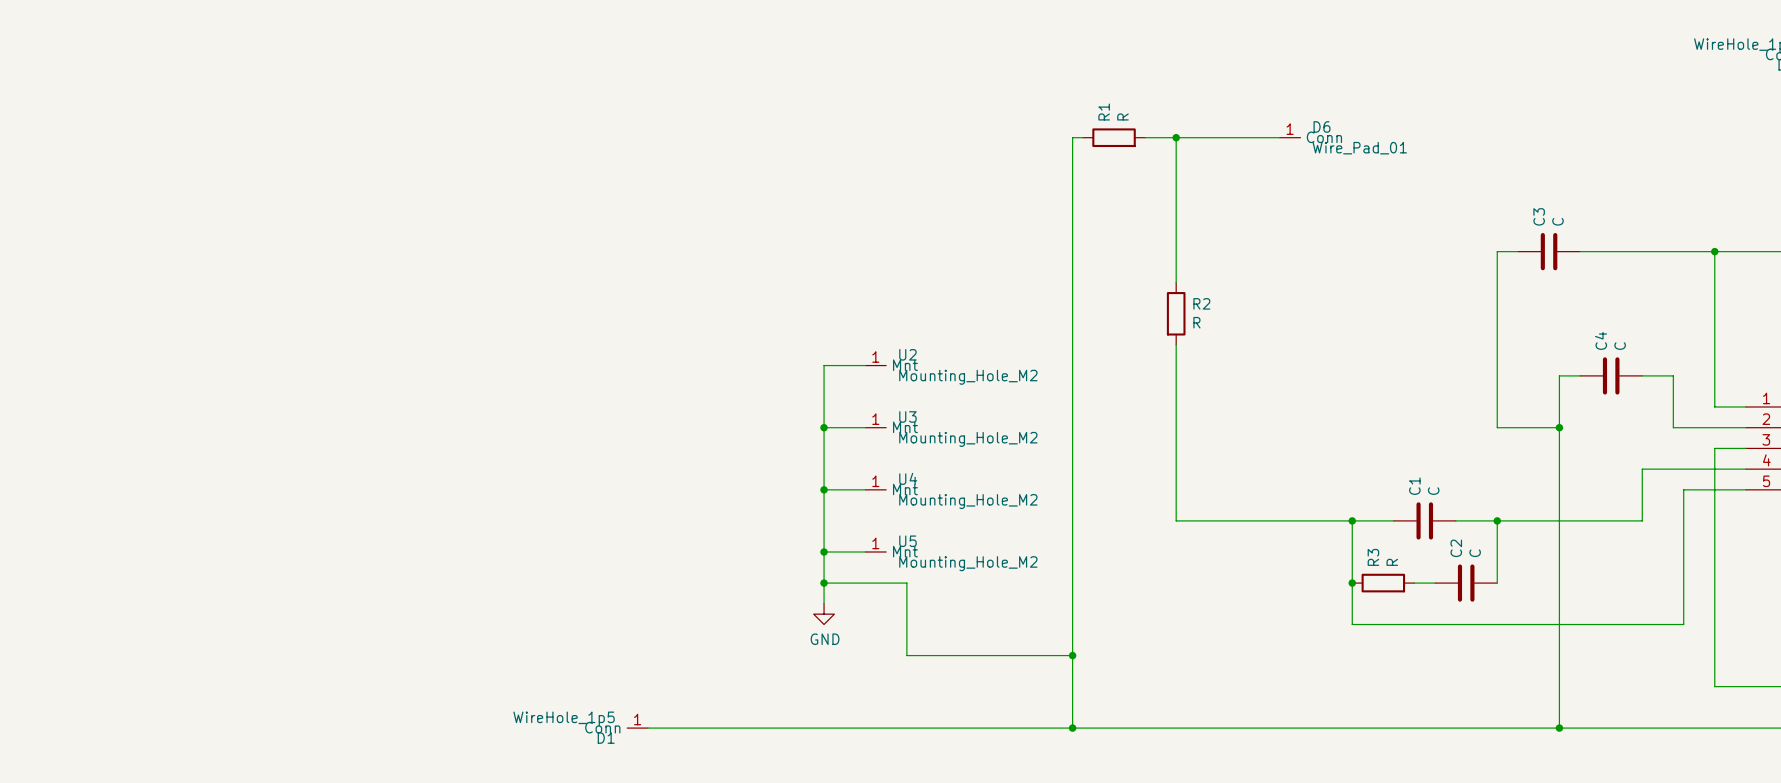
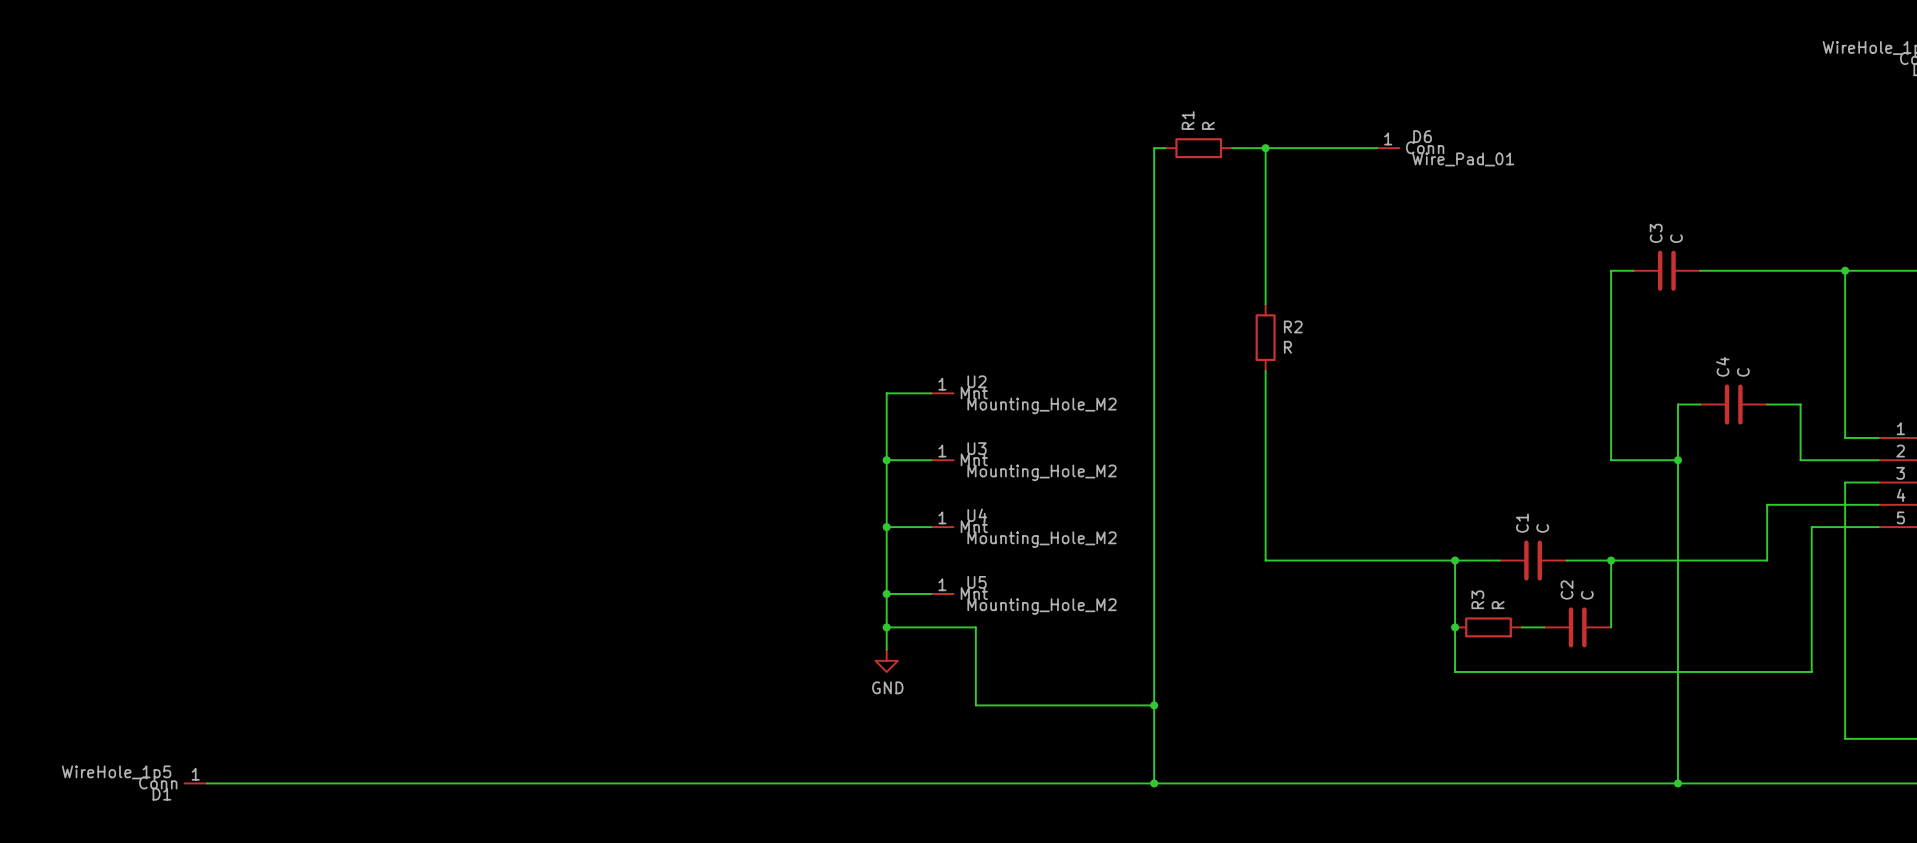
wire: none -> (206, 783) (697, 783)
D1 position: (637, 728) -> (195, 783)

